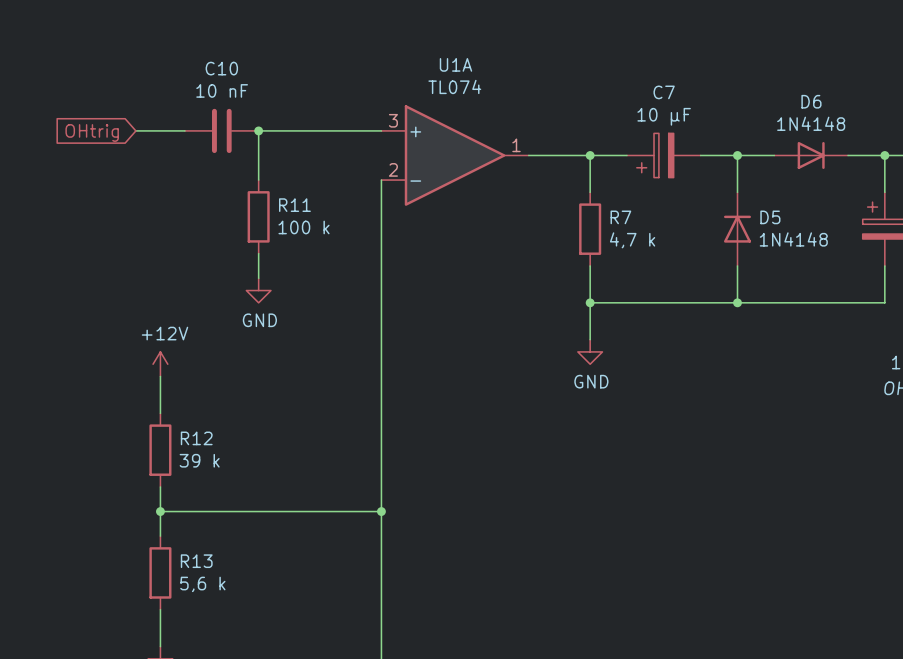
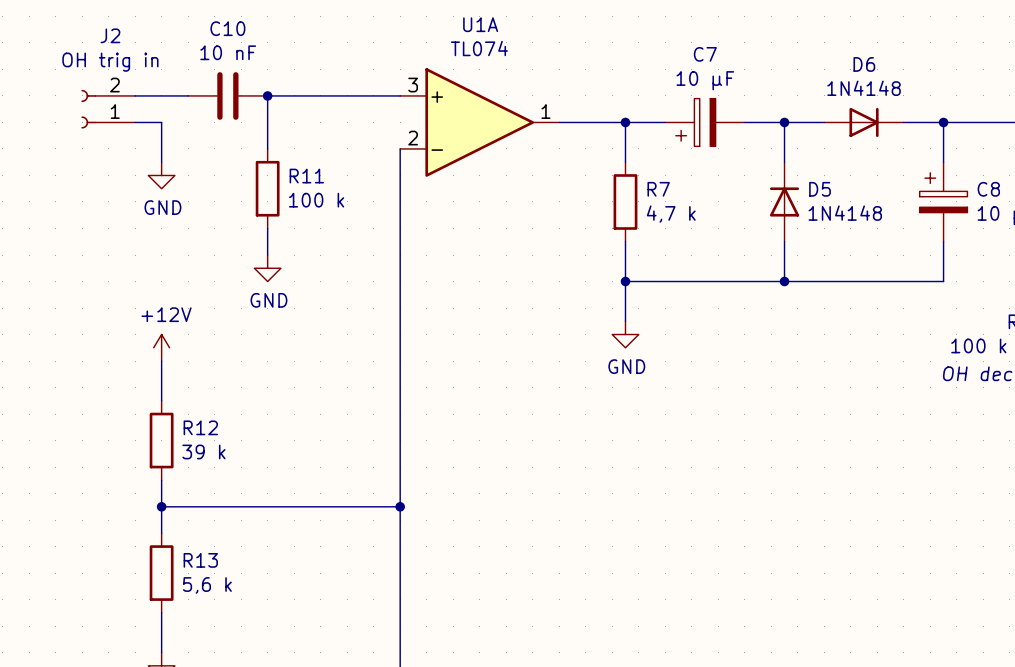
global label: OHtrig (92, 132) -> none
J2: none -> OH trig in (108, 109)
wire: none -> (135, 122) (161, 122) (161, 162)
power symbol: none -> GND (161, 175)

